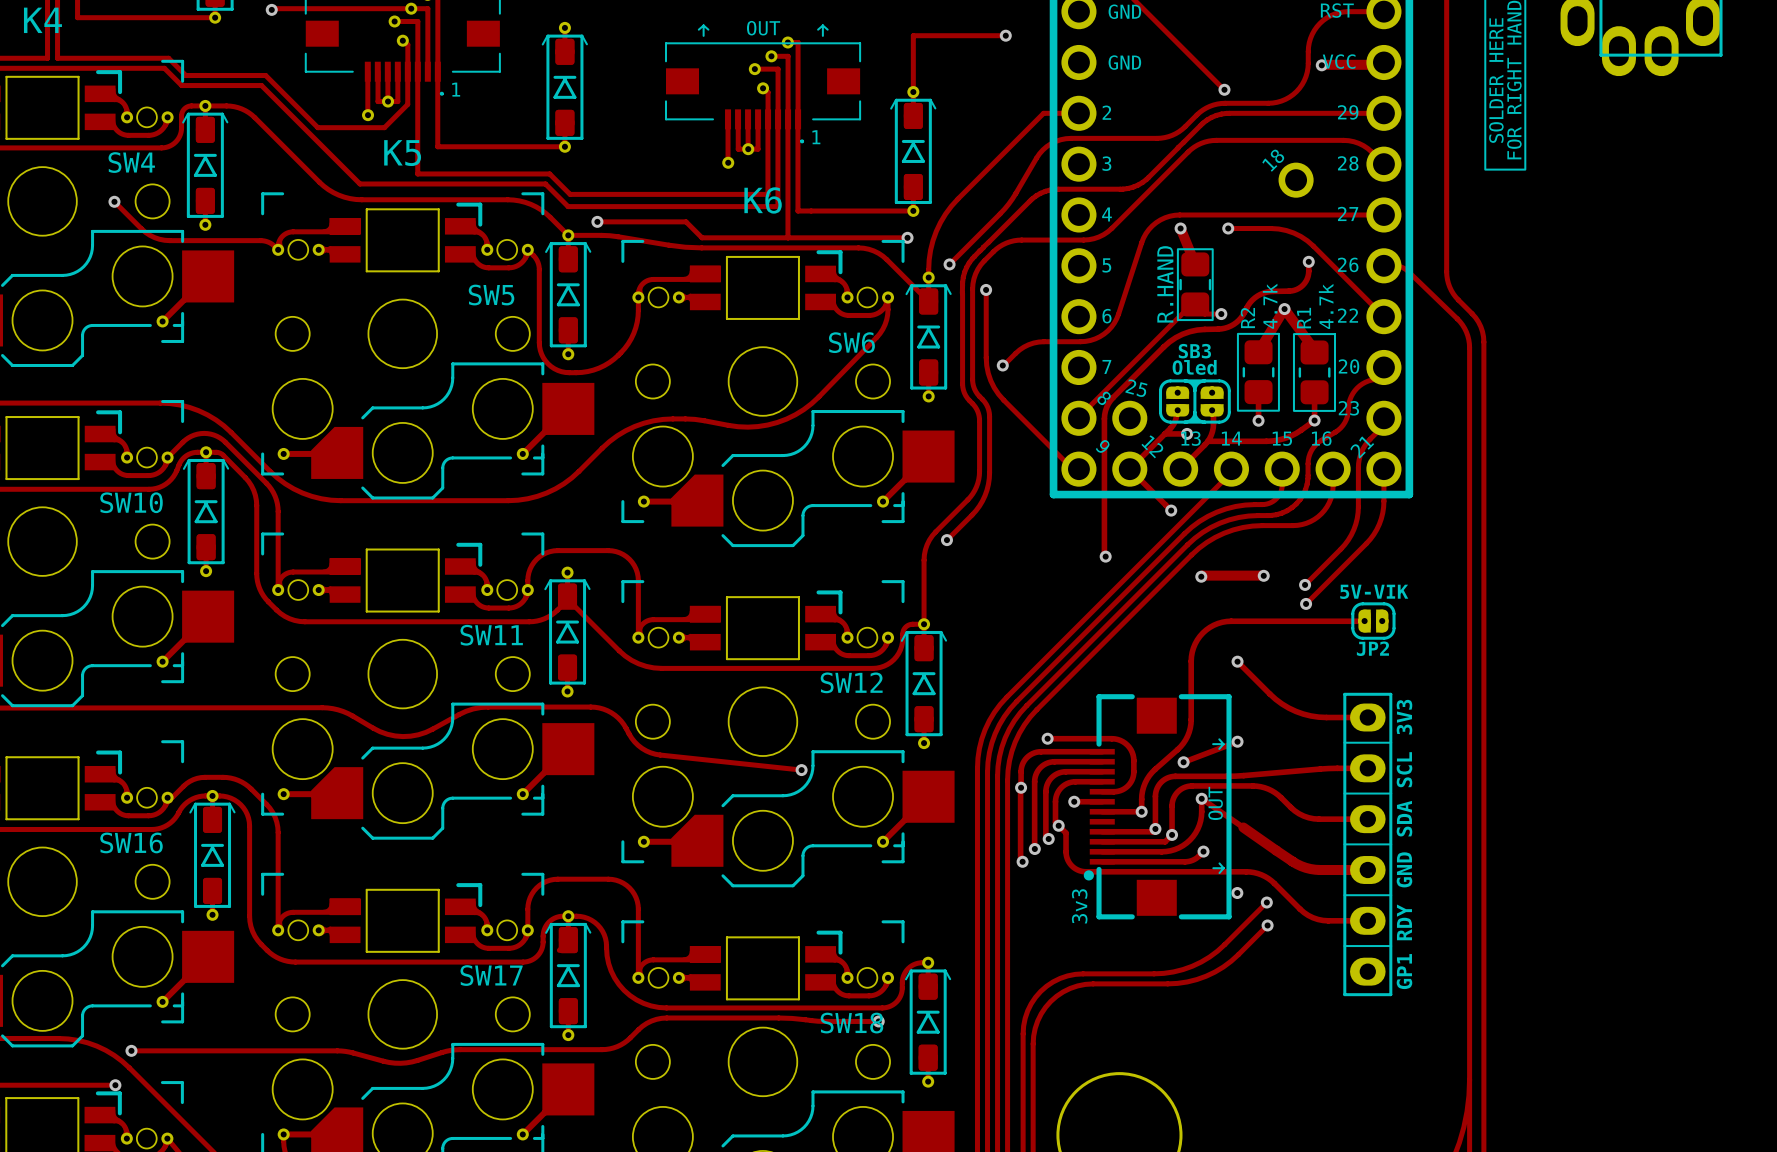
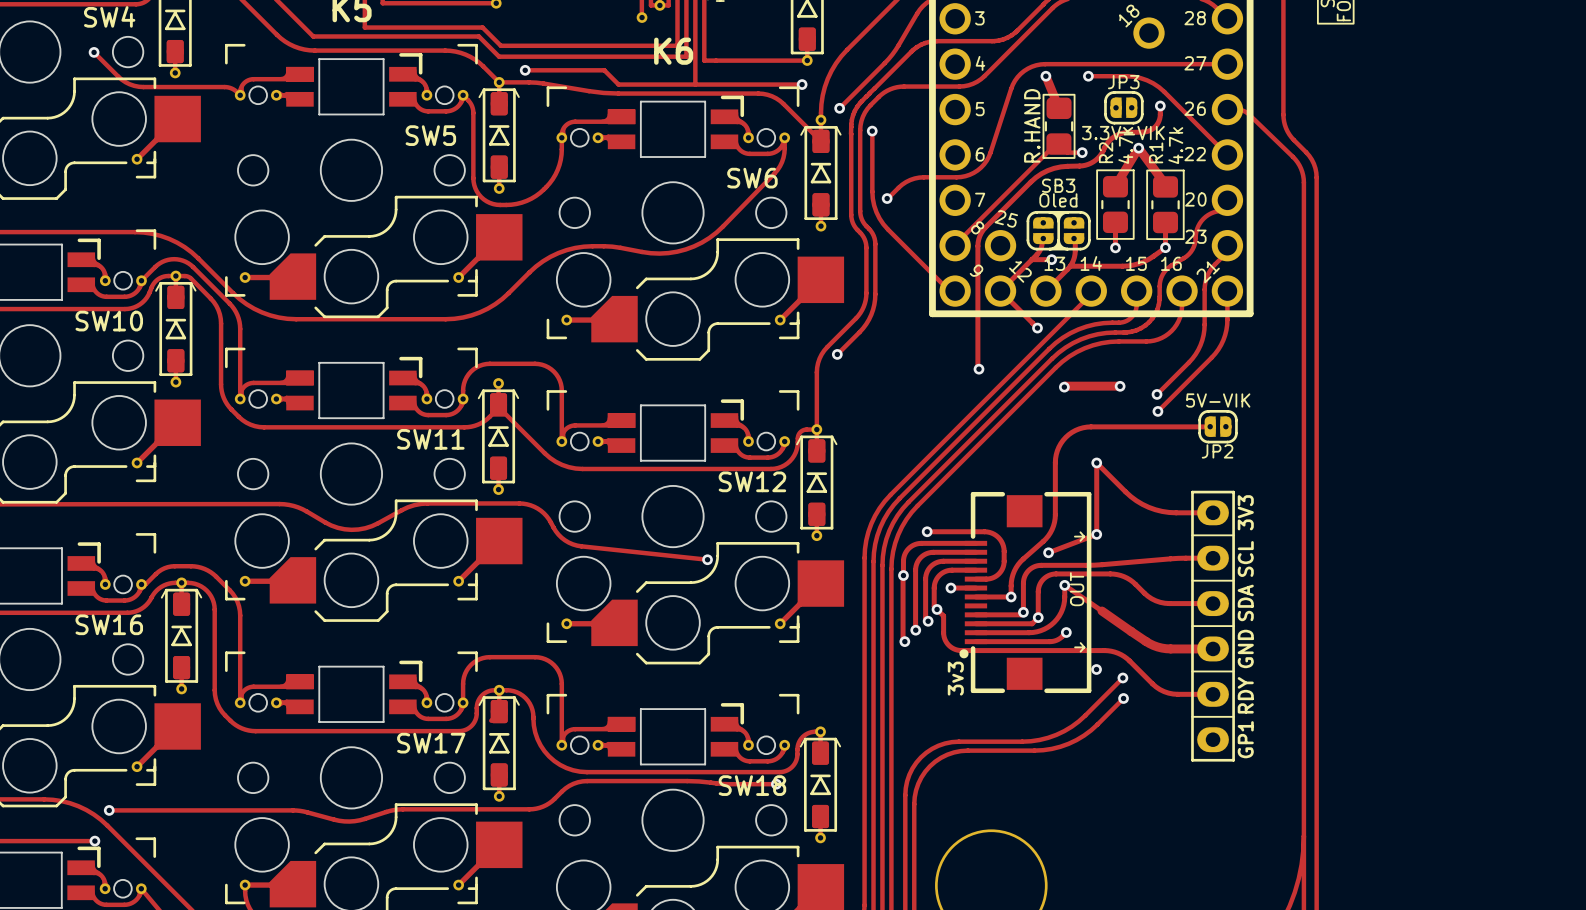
JP3: none -> 3.3V-VIK (1123, 107)
track: none -> (1096, 462) (1096, 534)

